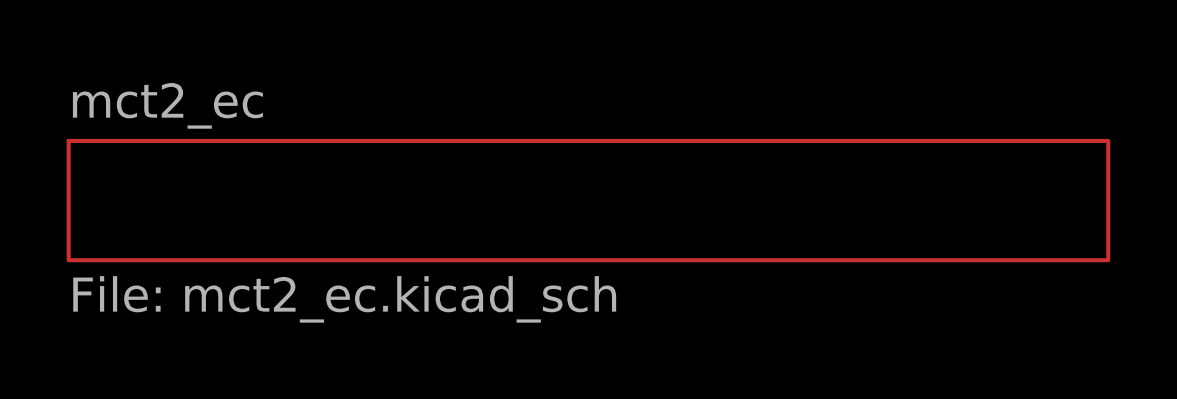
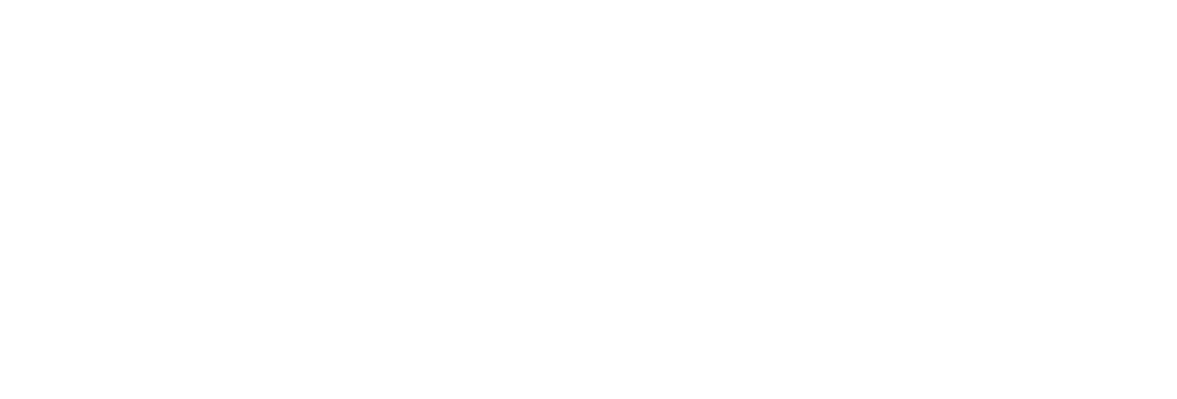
sheet mct2_ec: File: mct2_ec.kicad_sch (588, 200) -> none

